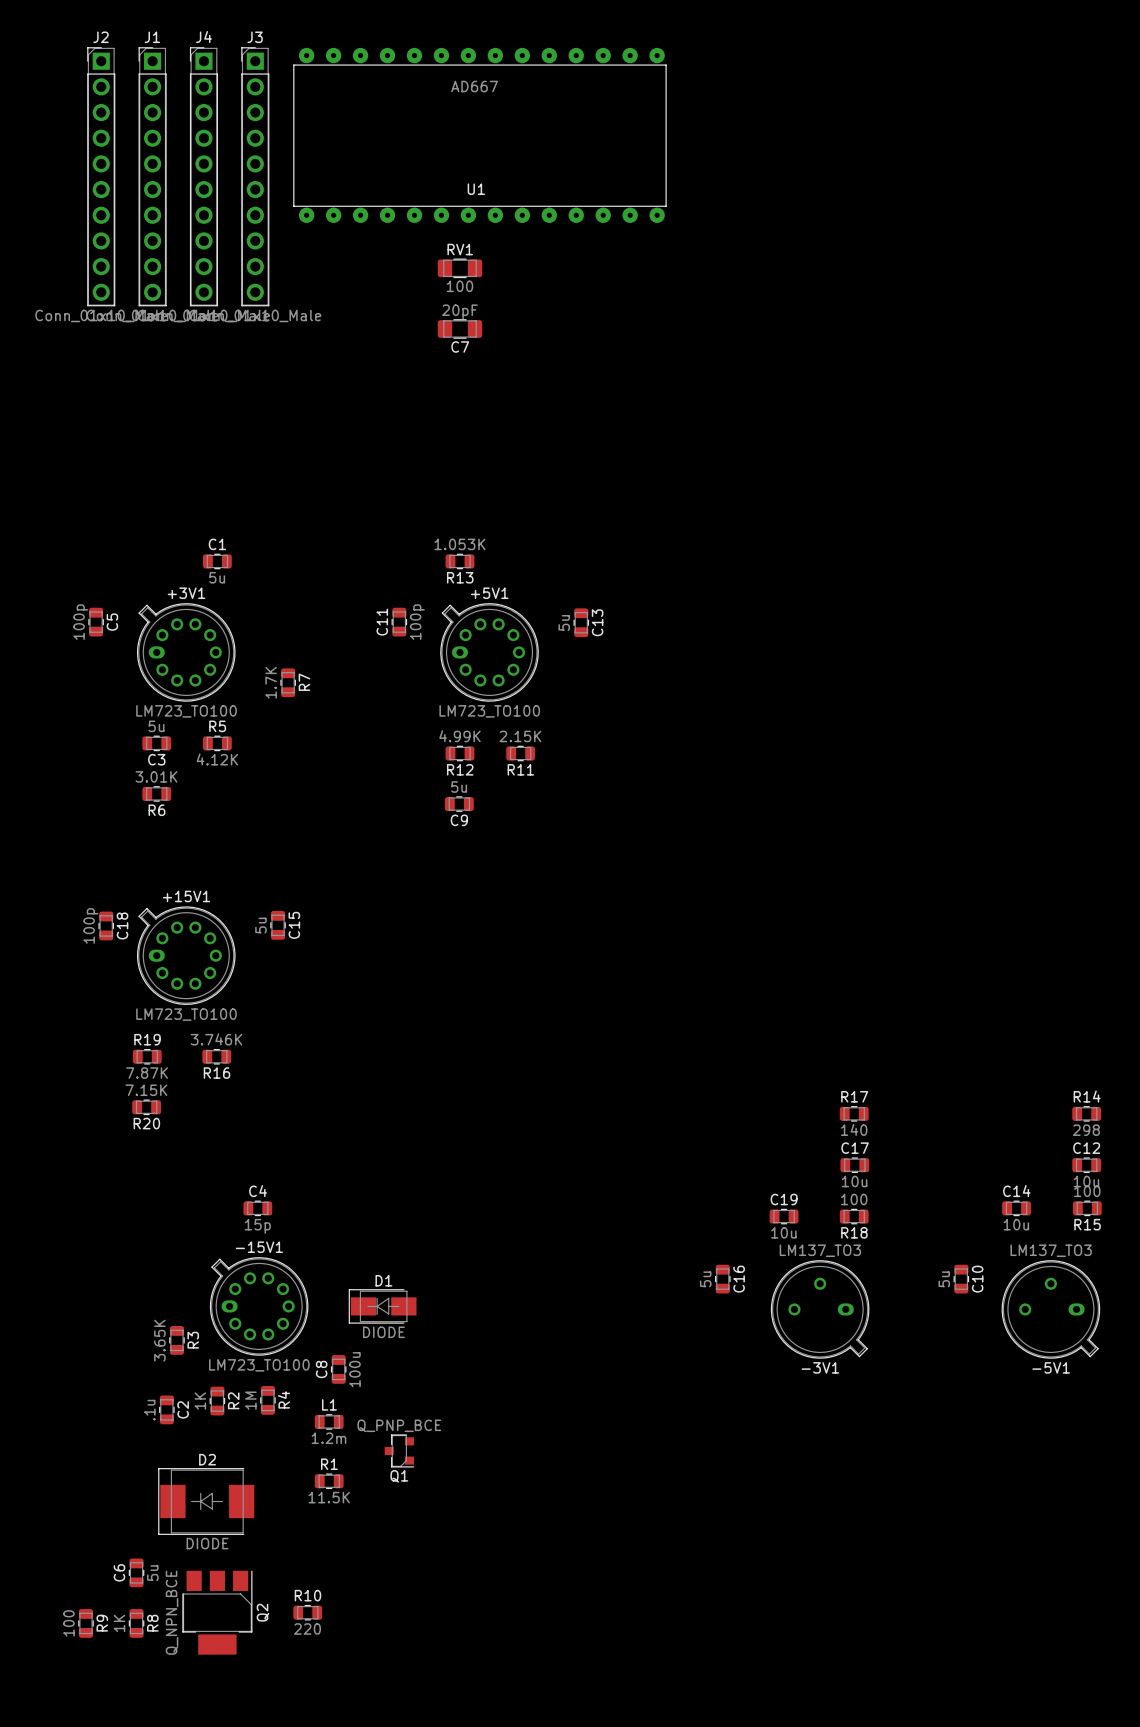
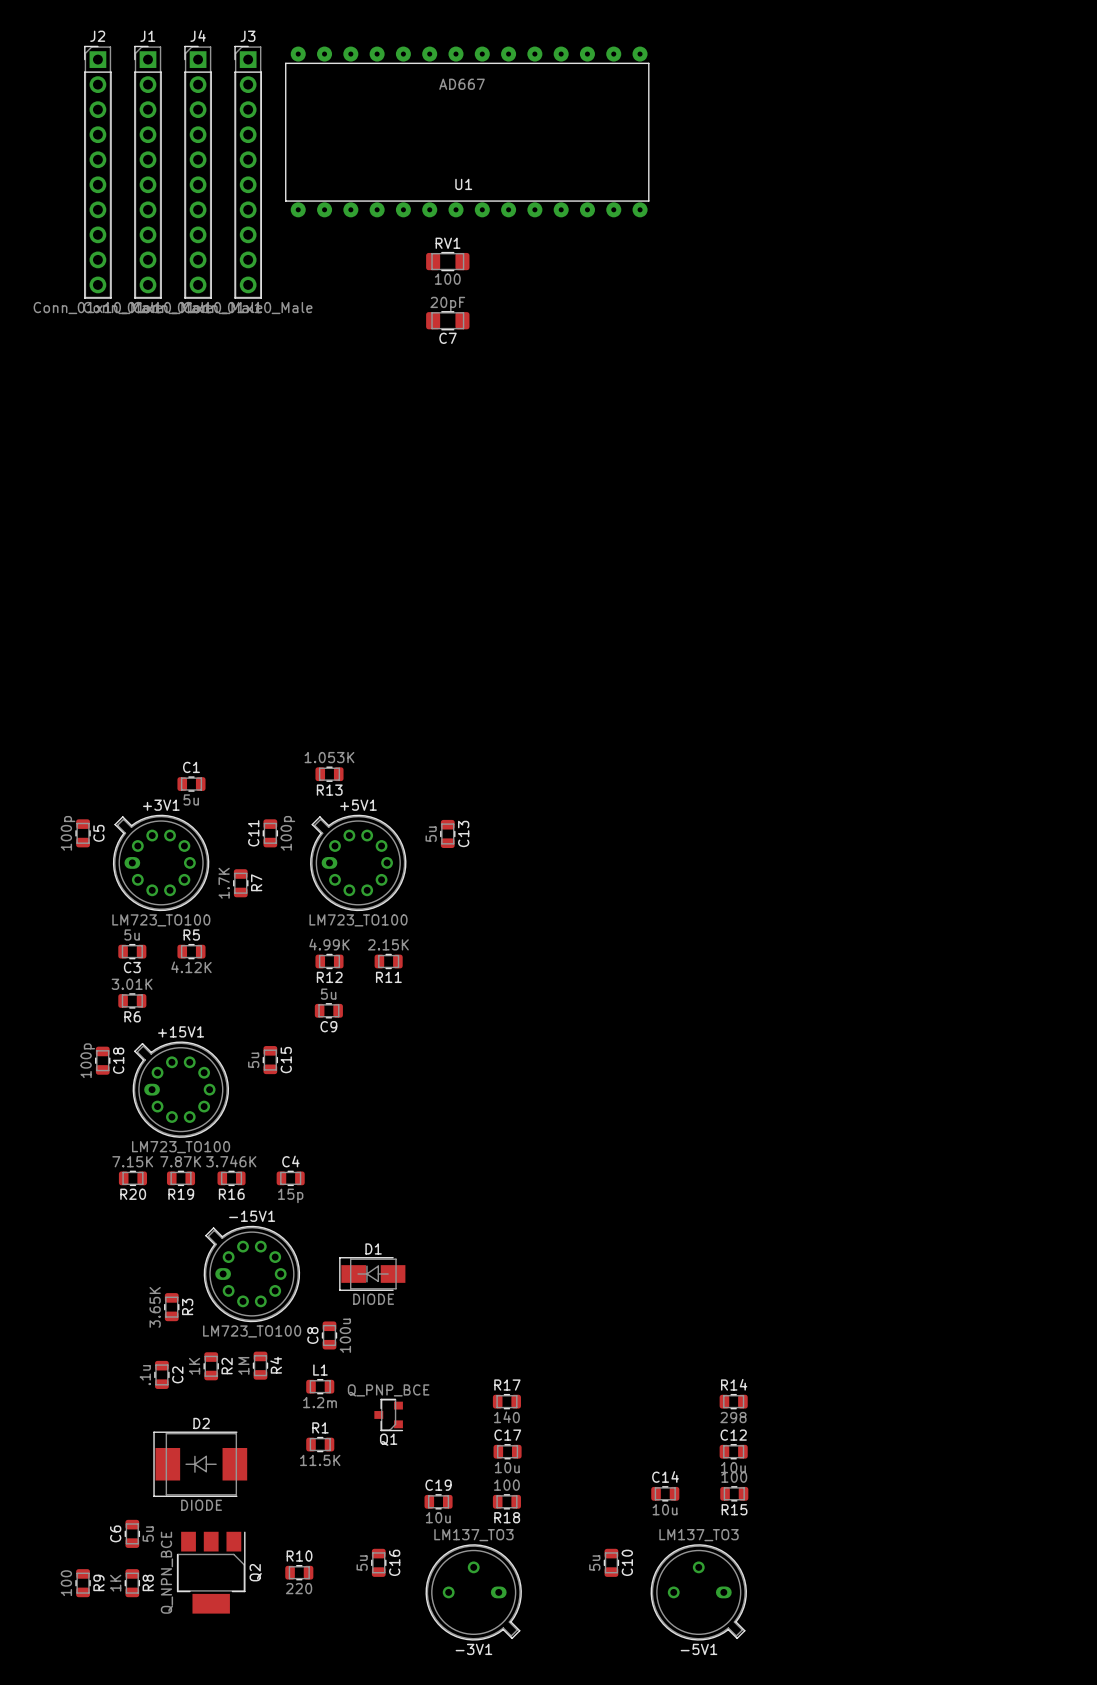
C1 position: (217, 561) -> (191, 784)
R13 position: (459, 561) -> (329, 774)
C5 position: (96, 622) -> (83, 833)
C11 position: (399, 622) -> (270, 833)
C13 position: (581, 622) -> (447, 833)
+3V1 position: (186, 652) -> (161, 862)
+5V1 position: (489, 652) -> (358, 862)
R7 position: (288, 682) -> (240, 883)
C3 position: (156, 743) -> (132, 951)
R5 position: (217, 743) -> (191, 951)
R12 position: (459, 753) -> (329, 961)
R11 position: (520, 753) -> (388, 961)
R6 position: (156, 793) -> (132, 1000)
C9 position: (459, 804) -> (328, 1010)
C18 position: (106, 925) -> (102, 1060)
C15 position: (278, 925) -> (270, 1060)
+15V1 position: (186, 955) -> (180, 1089)
R19 name position: R19 (147, 1039) -> R19 (181, 1194)
R19 position: (147, 1056) -> (181, 1178)
R16 position: (216, 1056) -> (231, 1178)
R19 value position: 7.87K (147, 1073) -> 7.87K (180, 1161)
R20 position: (146, 1107) -> (132, 1178)
R17 position: (854, 1113) -> (506, 1401)
R14 position: (1086, 1113) -> (733, 1401)
C17 position: (854, 1165) -> (507, 1451)
C12 position: (1086, 1165) -> (733, 1451)
C4 position: (257, 1208) -> (290, 1178)
C14 position: (1016, 1208) -> (665, 1493)
R15 position: (1087, 1208) -> (734, 1493)
C19 position: (784, 1216) -> (438, 1501)
R18 position: (854, 1216) -> (506, 1501)
C16 position: (722, 1279) -> (378, 1562)
C10 position: (961, 1279) -> (611, 1562)
-3V1 position: (820, 1309) -> (473, 1592)
-5V1 position: (1050, 1309) -> (698, 1592)

